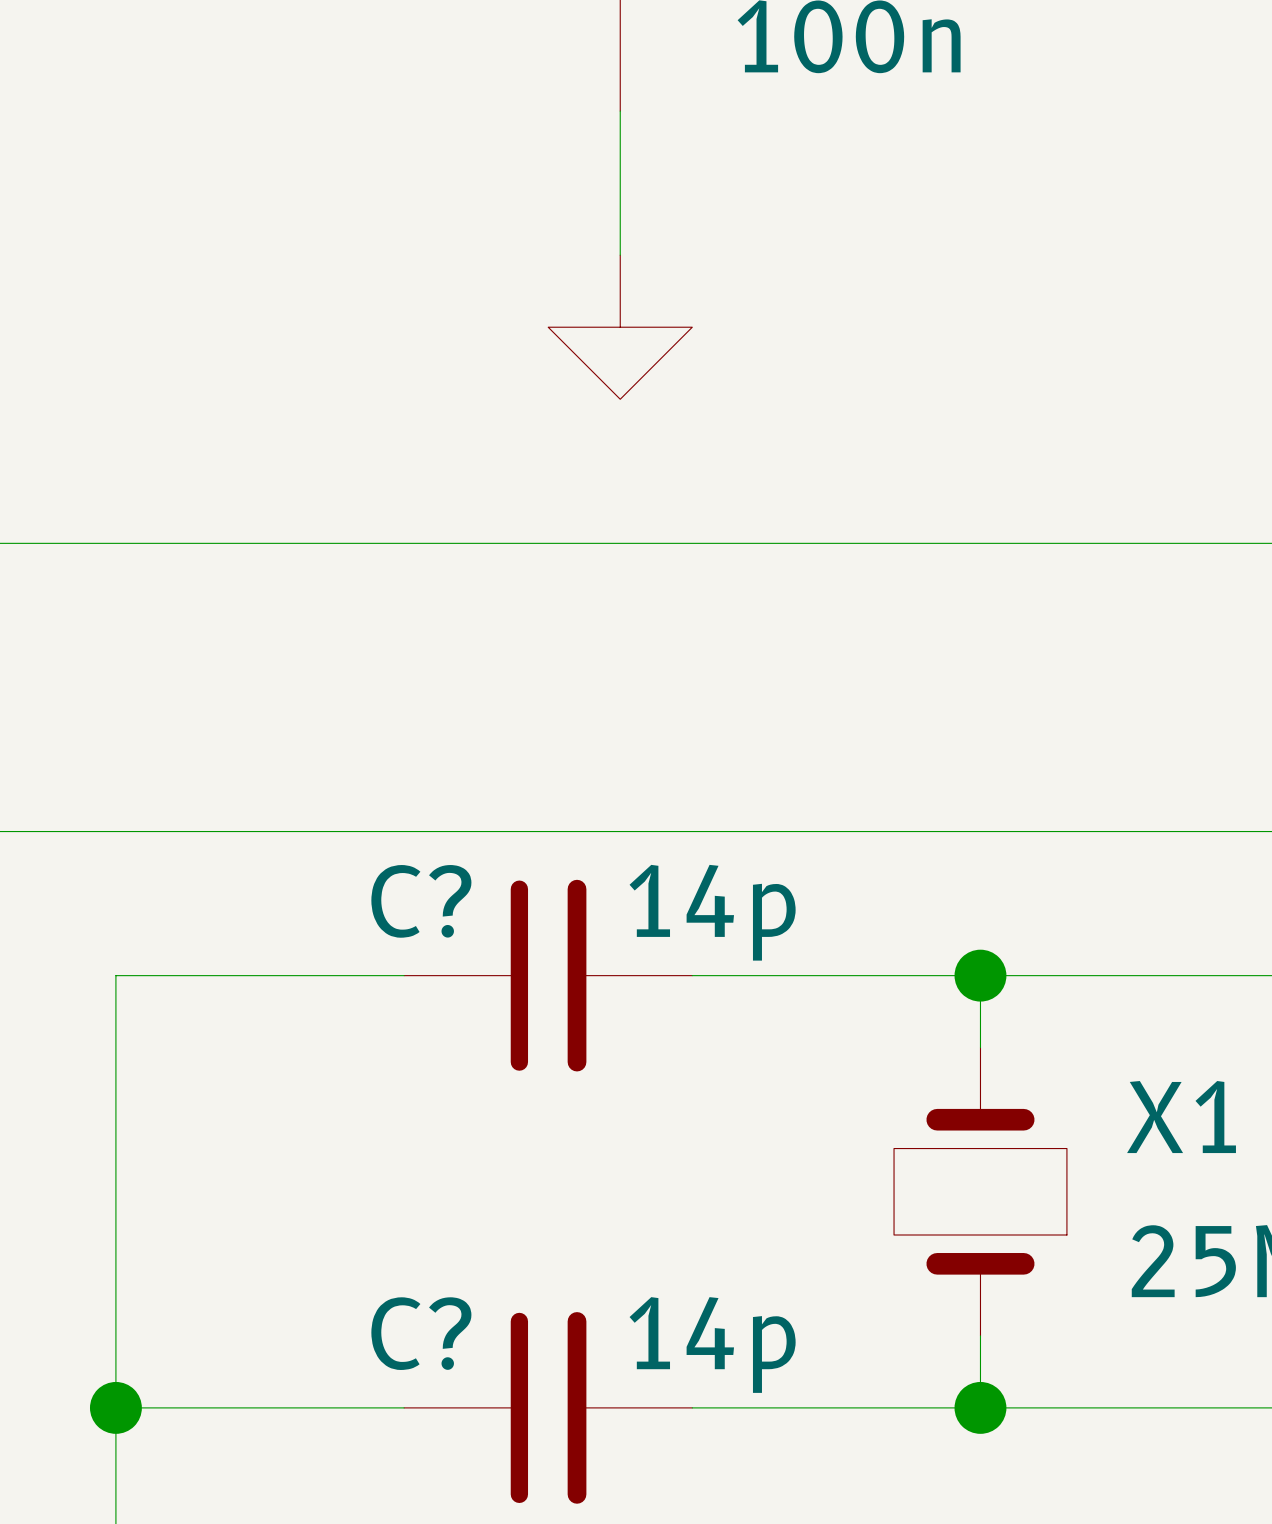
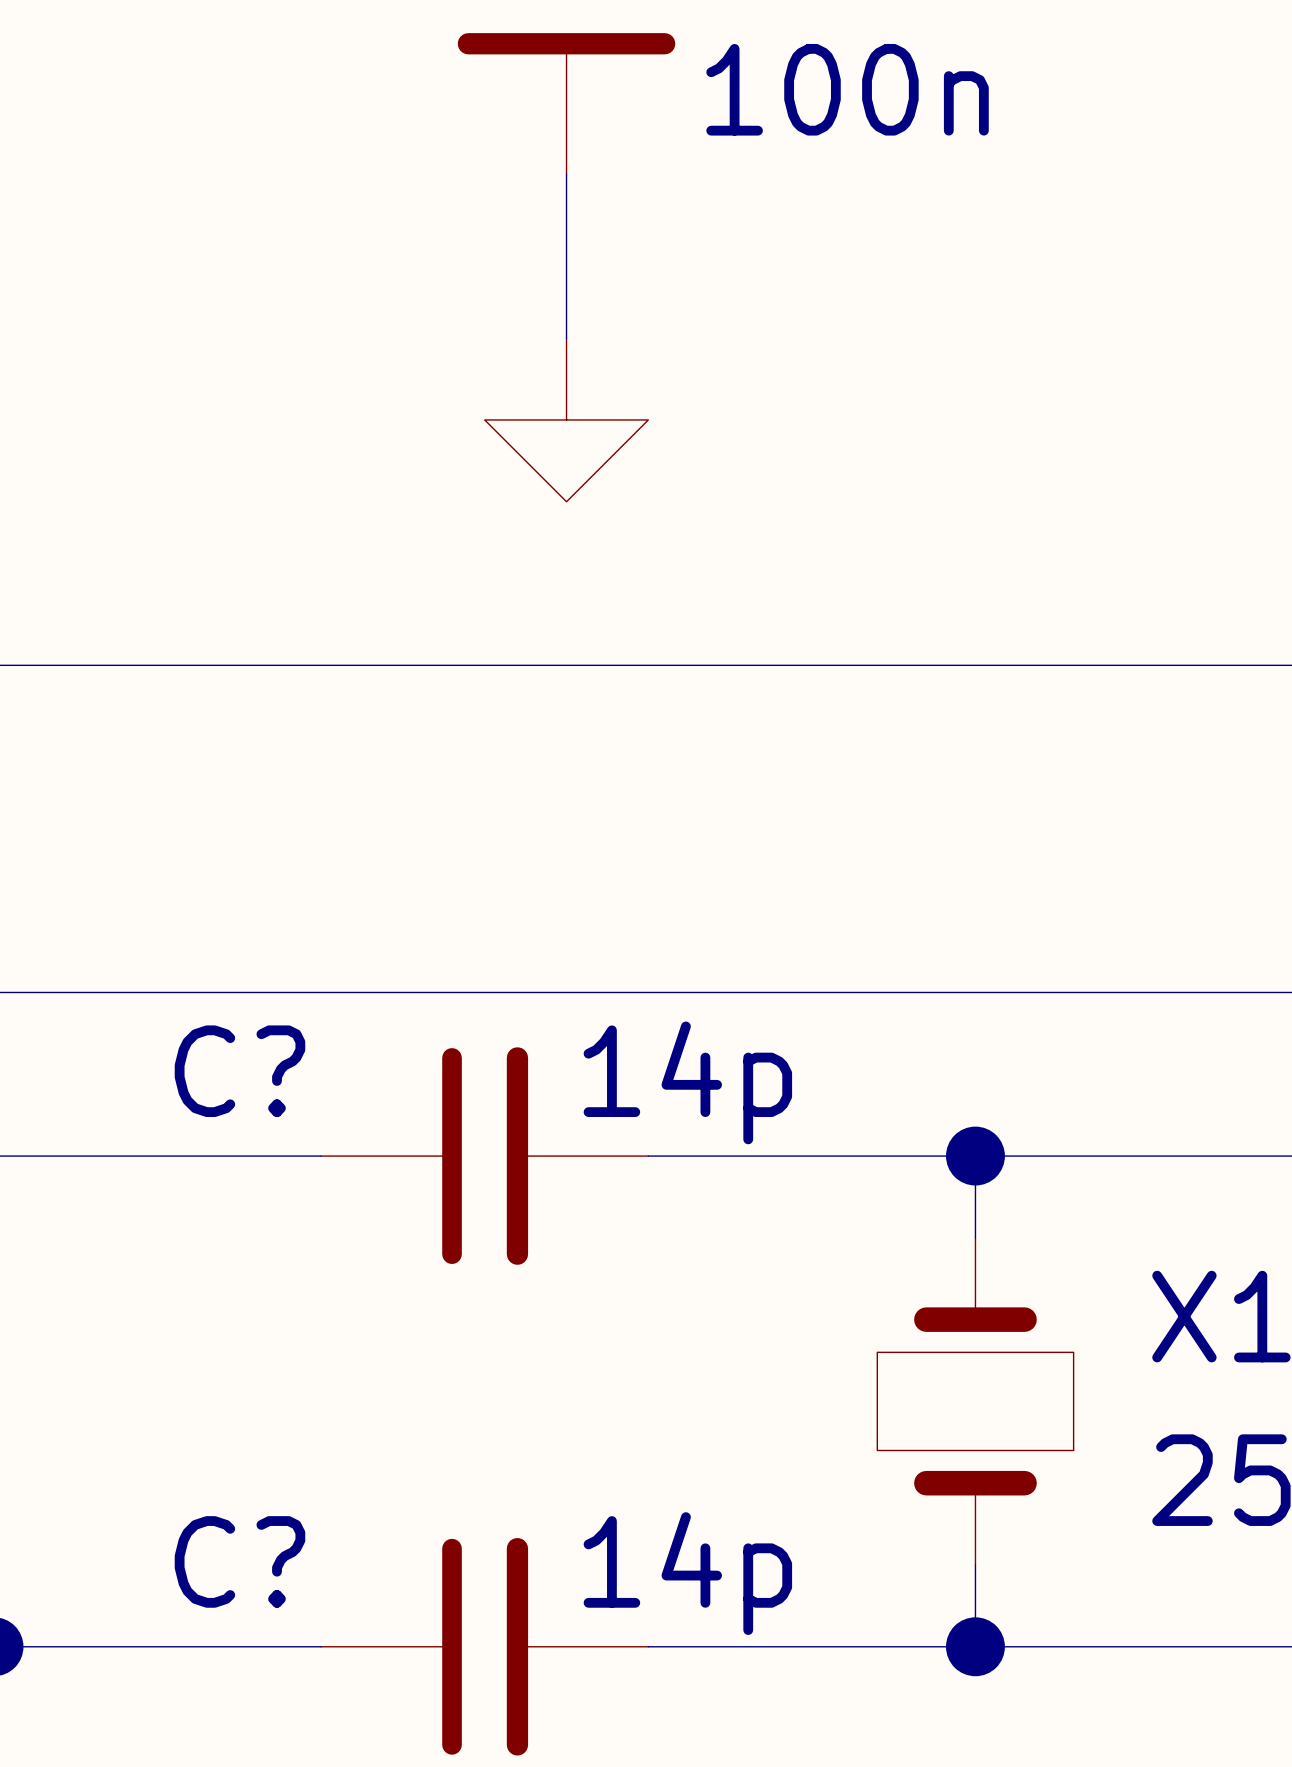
C? name position: C? (421, 901) -> C? (239, 1071)
C? name position: C? (421, 1333) -> C? (239, 1561)

